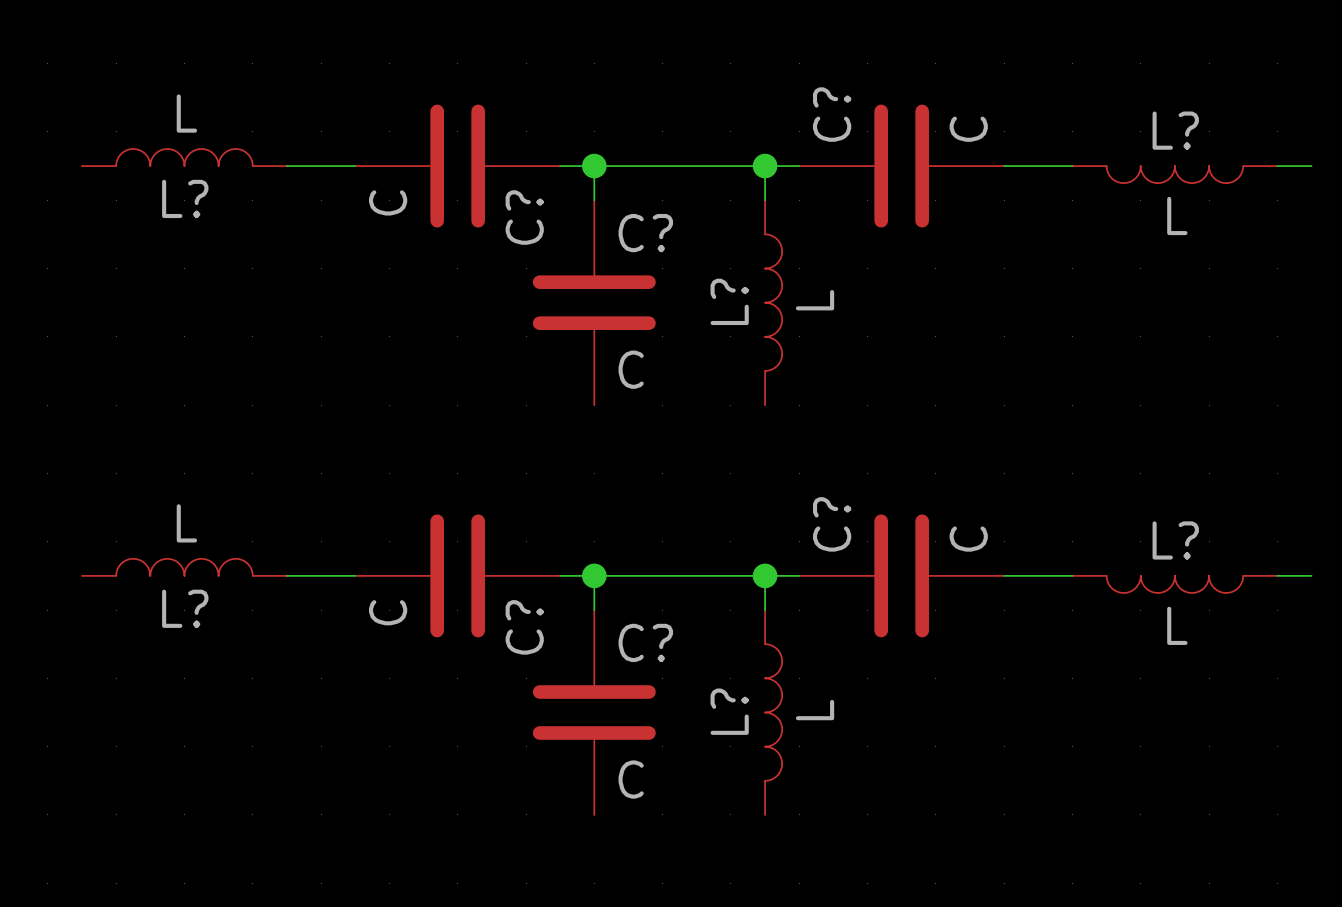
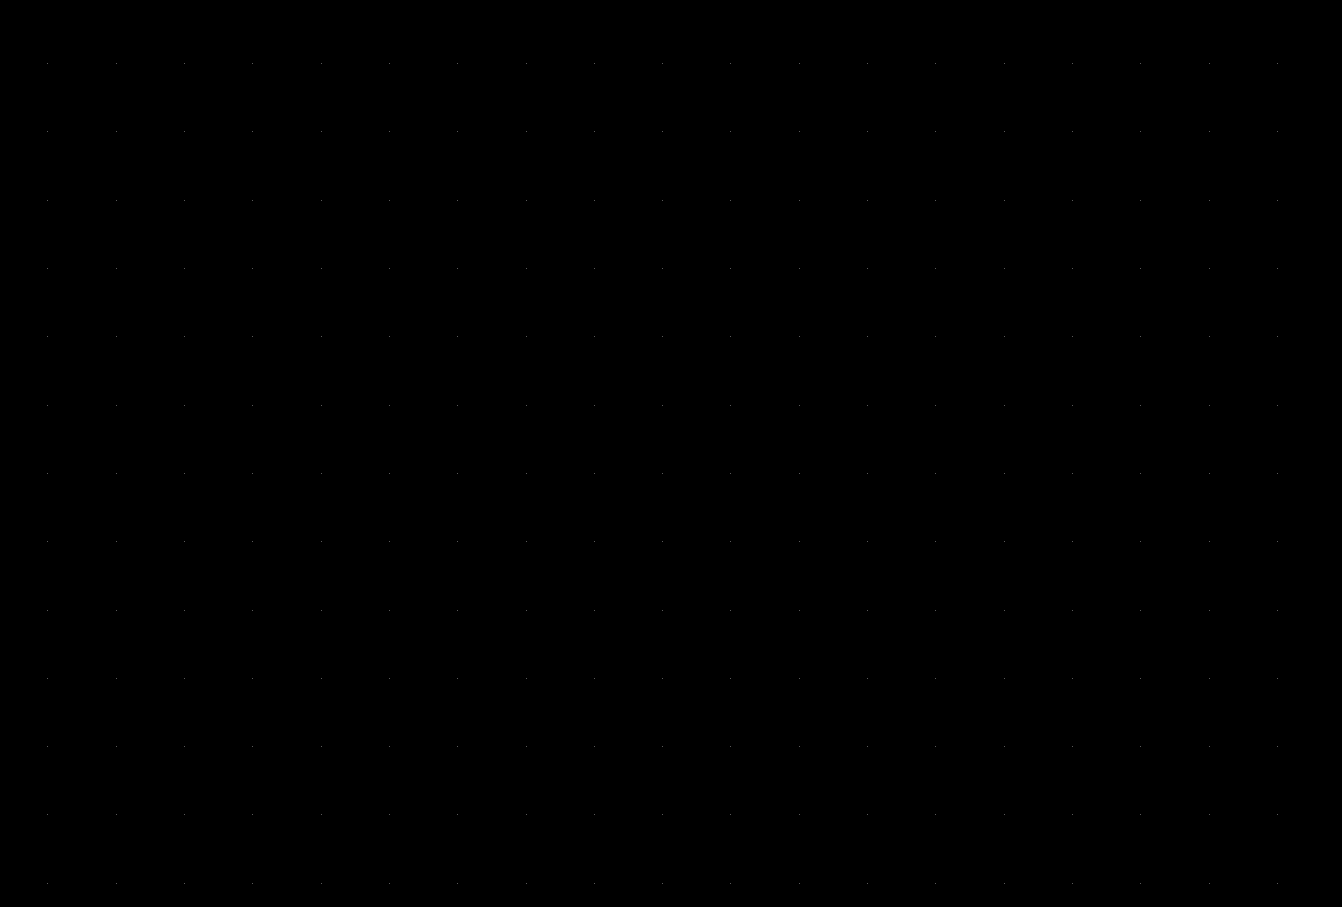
L?: L (184, 157) -> none
wire: (286, 166) (355, 166) -> none
C?: C (457, 166) -> none
wire: (560, 166) (799, 166) -> none
wire: (594, 166) (594, 200) -> none
junction: (594, 166) -> none
wire: (765, 166) (765, 200) -> none
junction: (765, 166) -> none
C?: C (901, 166) -> none
wire: (1004, 166) (1072, 166) -> none
wire: (1277, 166) (1311, 166) -> none
L?: L (1174, 174) -> none
C?: C (594, 302) -> none
L?: L (773, 302) -> none
L?: L (184, 567) -> none
wire: (286, 575) (355, 575) -> none
C?: C (457, 575) -> none
wire: (560, 575) (799, 575) -> none
wire: (594, 575) (594, 610) -> none
junction: (594, 575) -> none
wire: (765, 575) (765, 610) -> none
junction: (765, 575) -> none
C?: C (901, 575) -> none
wire: (1004, 575) (1072, 575) -> none
wire: (1277, 575) (1311, 575) -> none
L?: L (1174, 584) -> none
C?: C (594, 712) -> none
L?: L (773, 712) -> none

